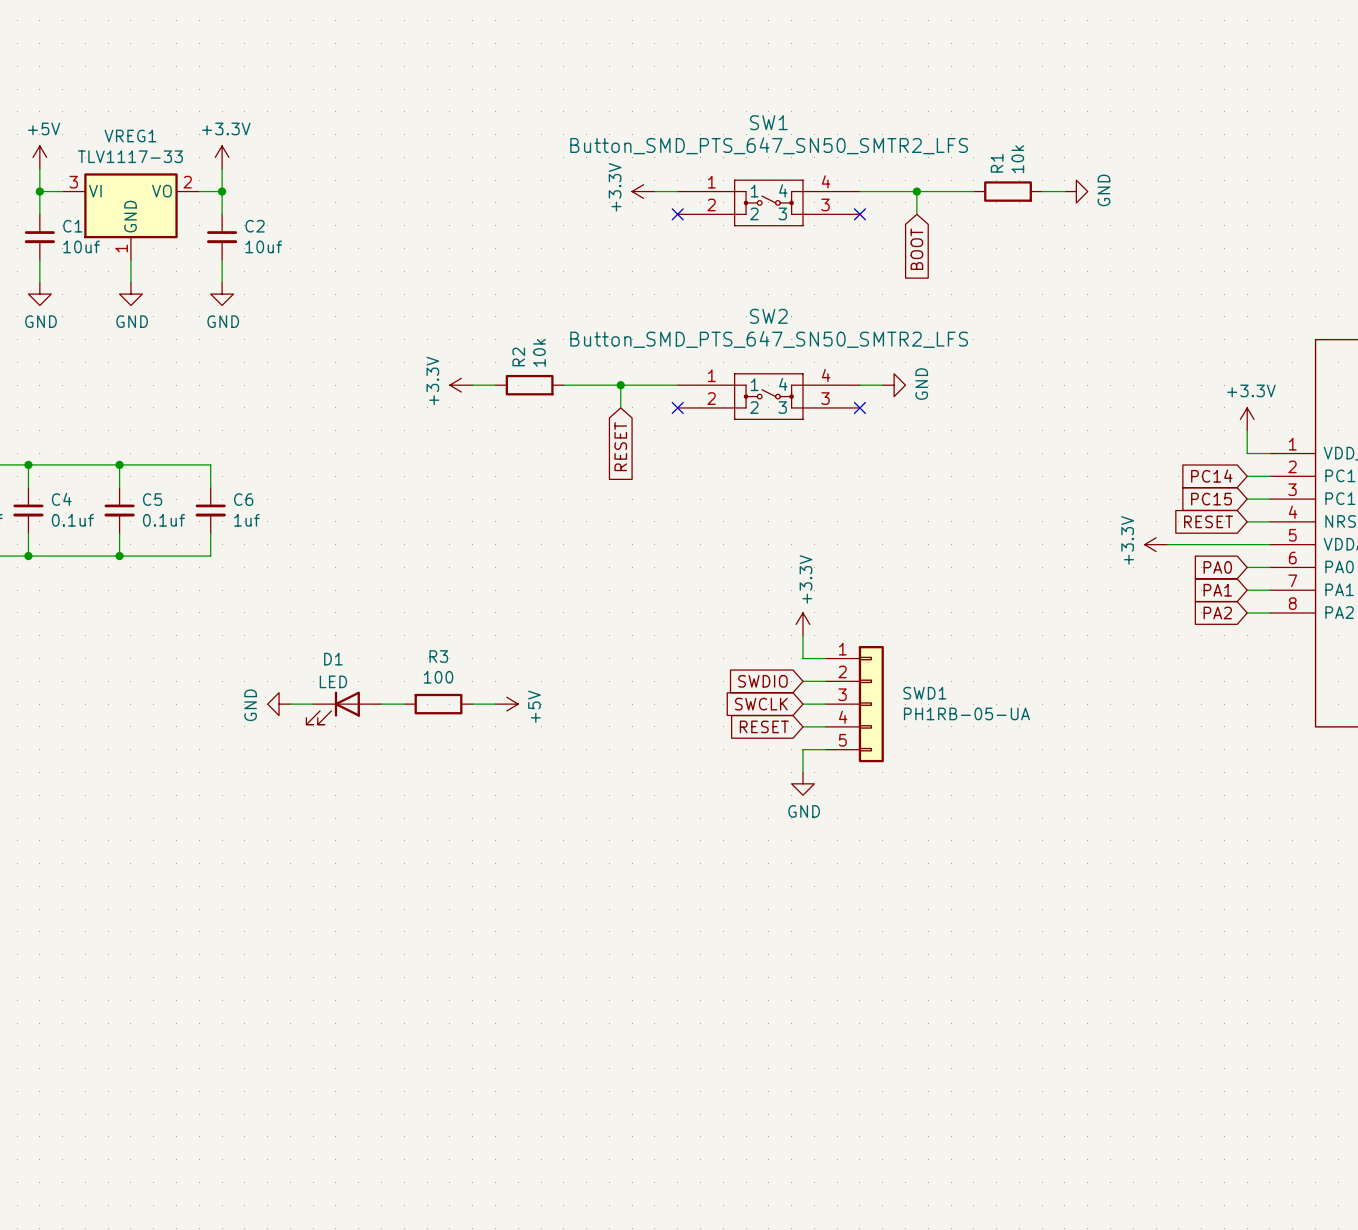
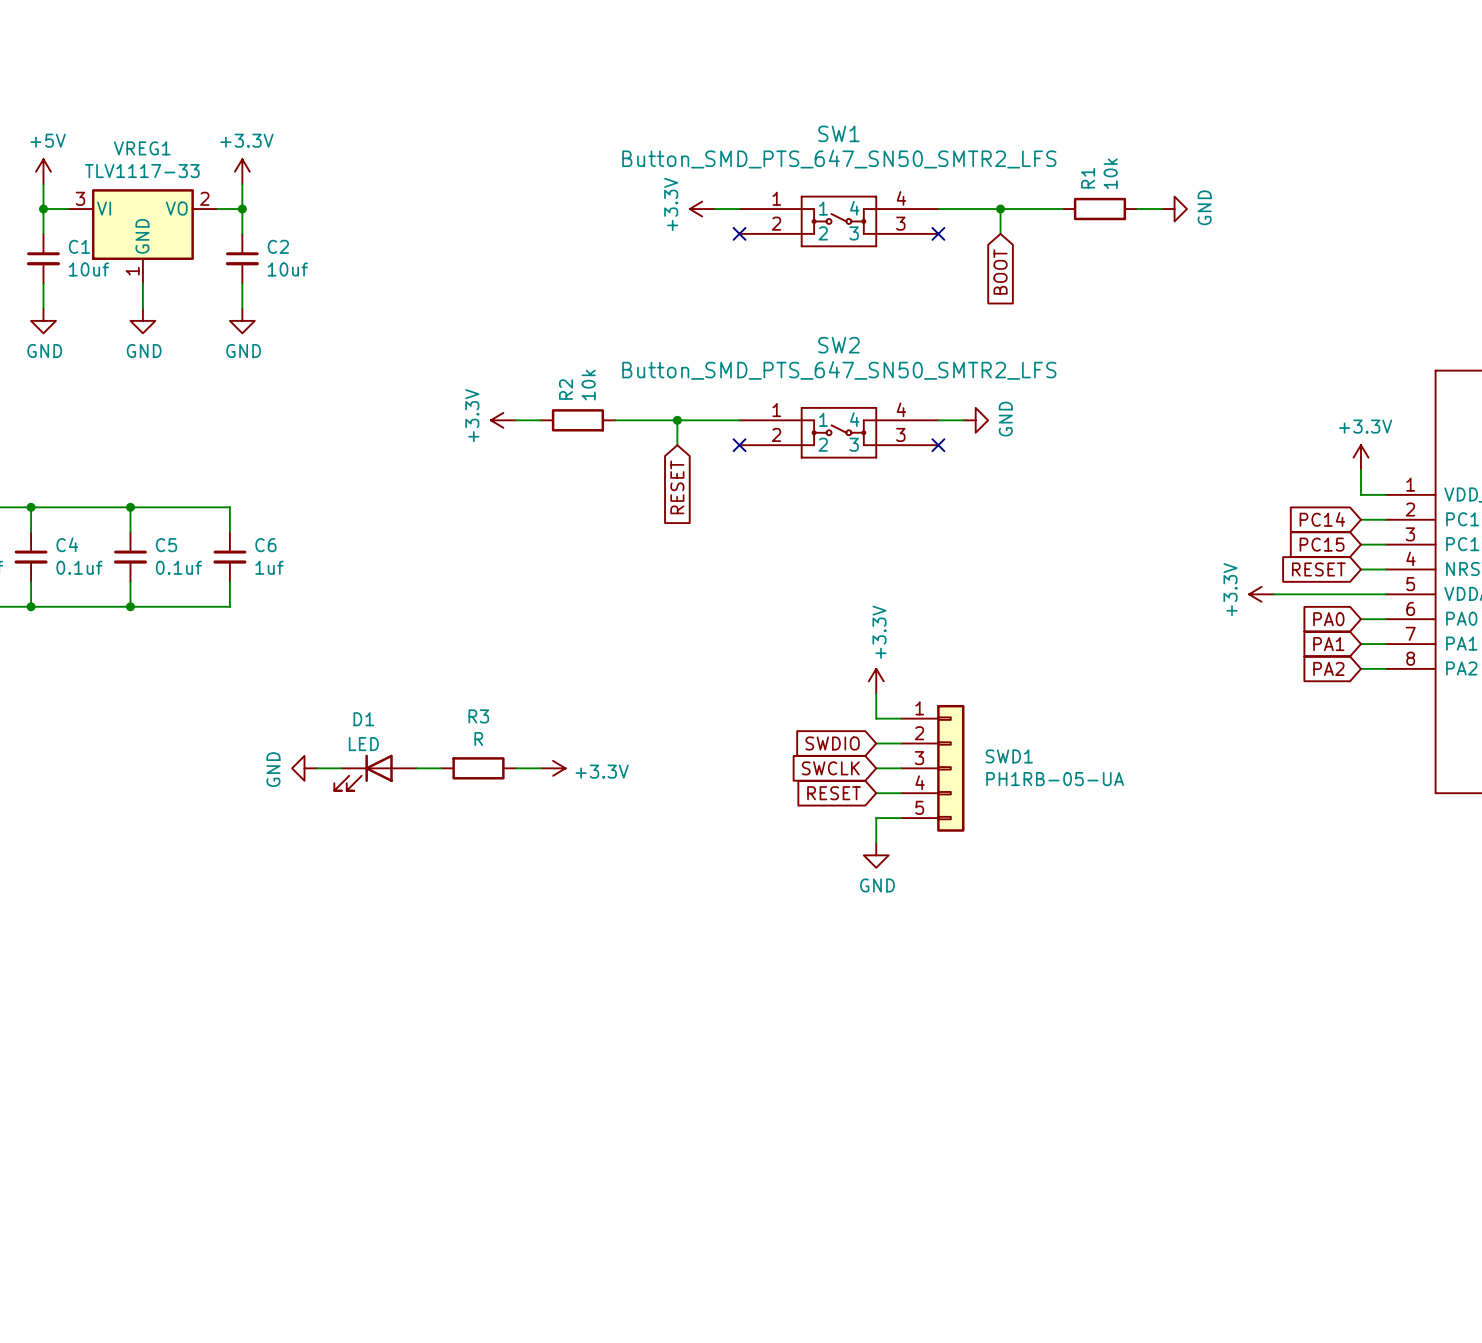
R3 value: 100 (438, 677) -> R (478, 739)
power symbol: +5V (506, 704) -> +3.3V (553, 768)

